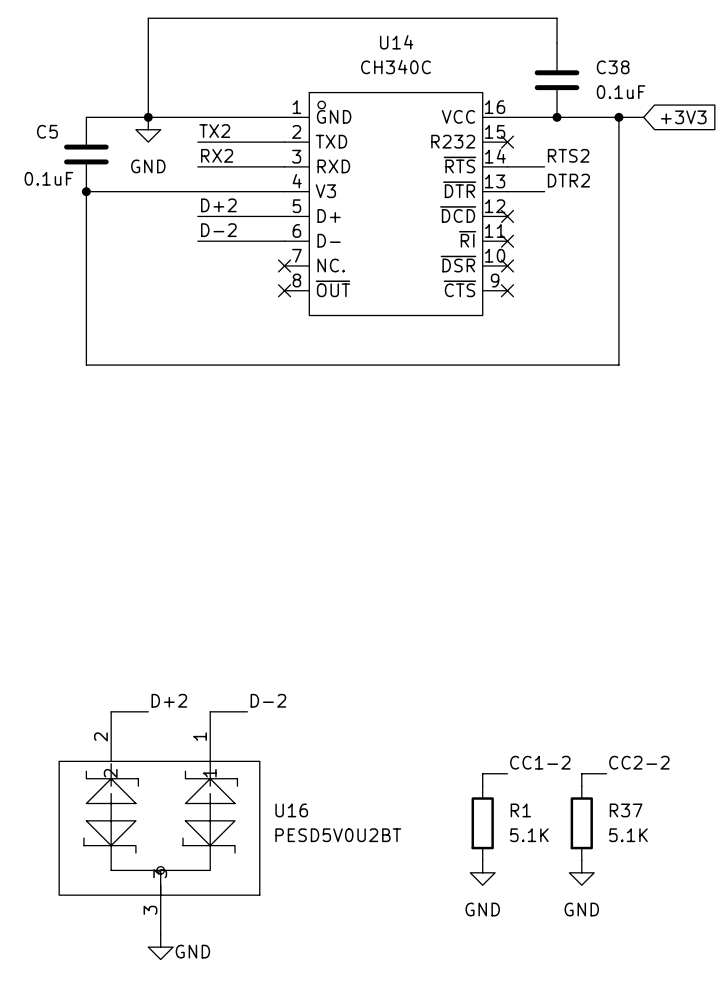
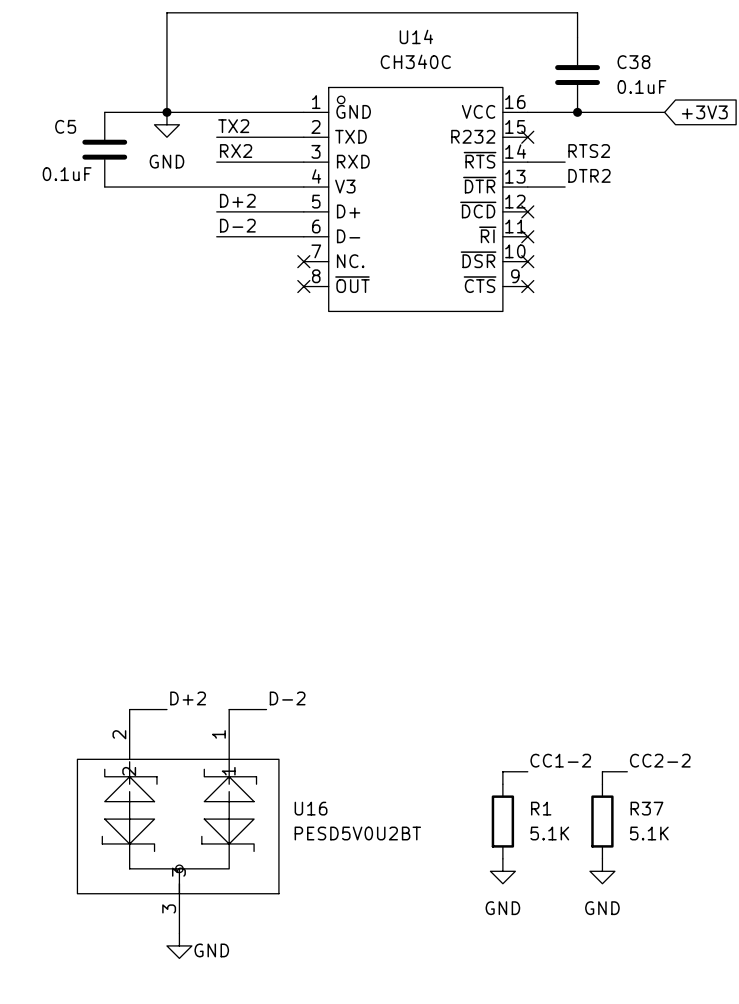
wire: (618, 117) (618, 365) (86, 365) (86, 191) -> none
junction: (618, 117) -> none
junction: (86, 191) -> none

